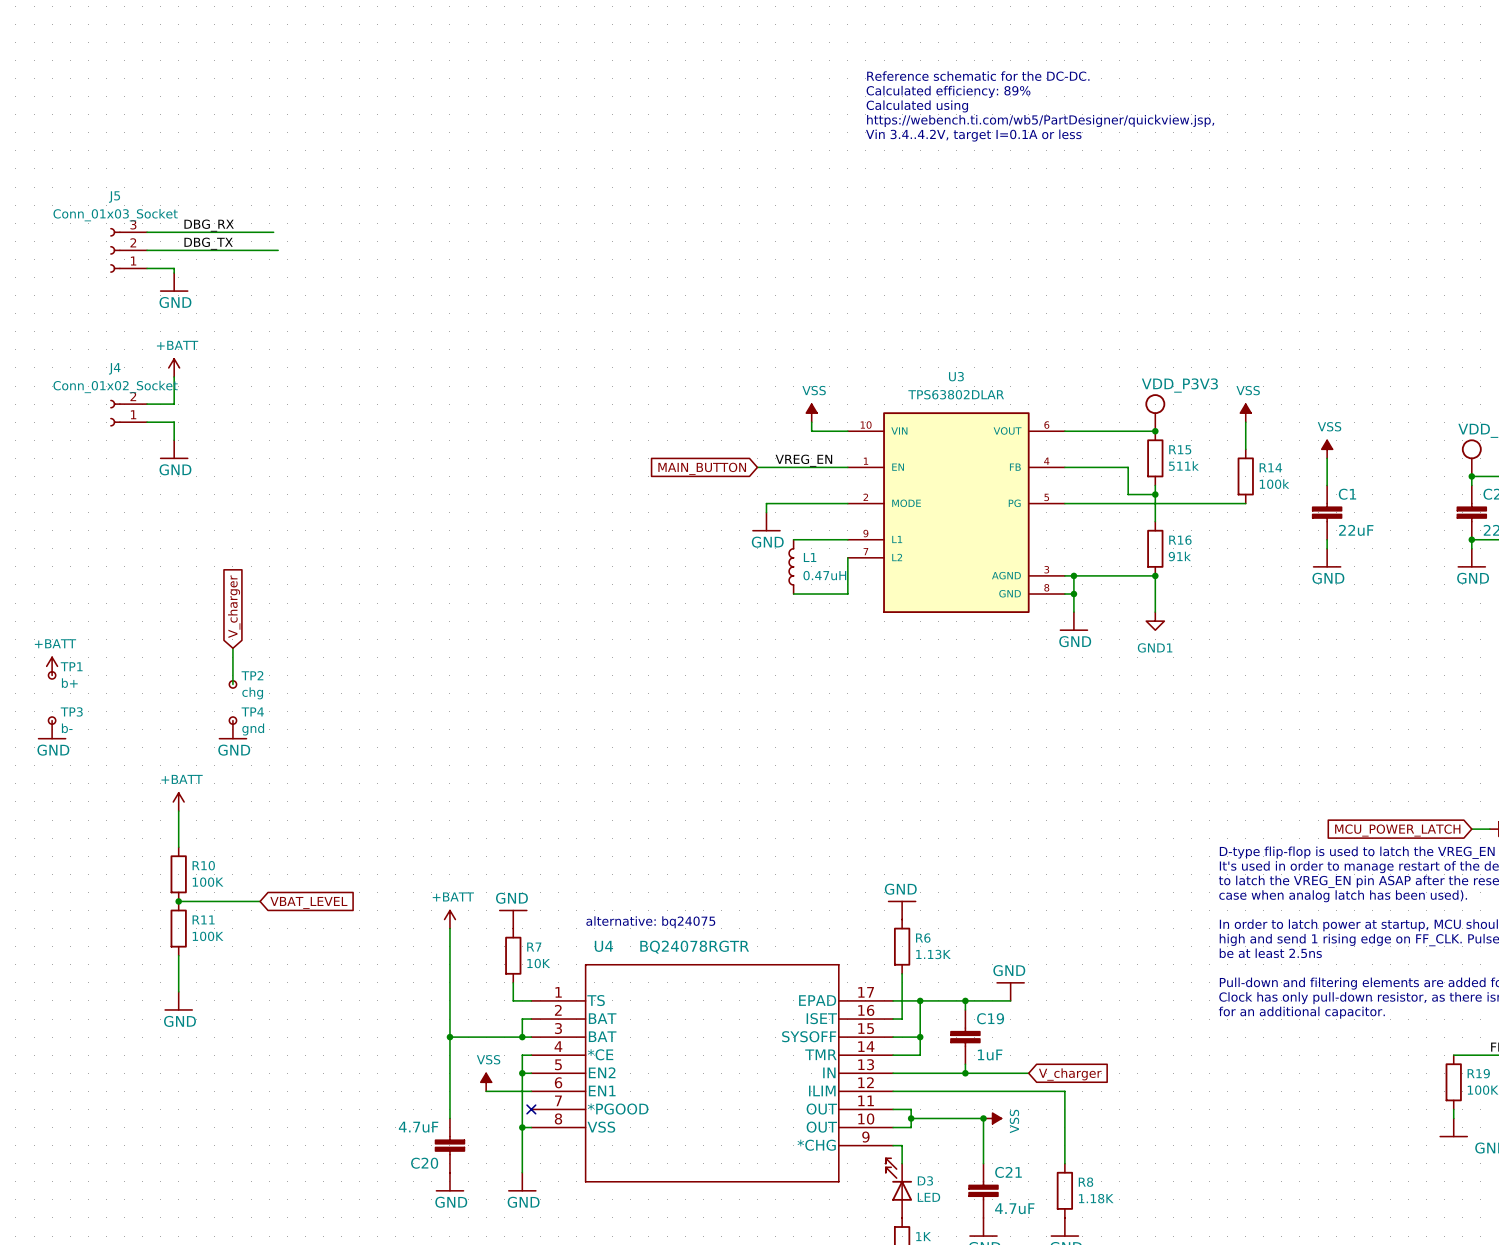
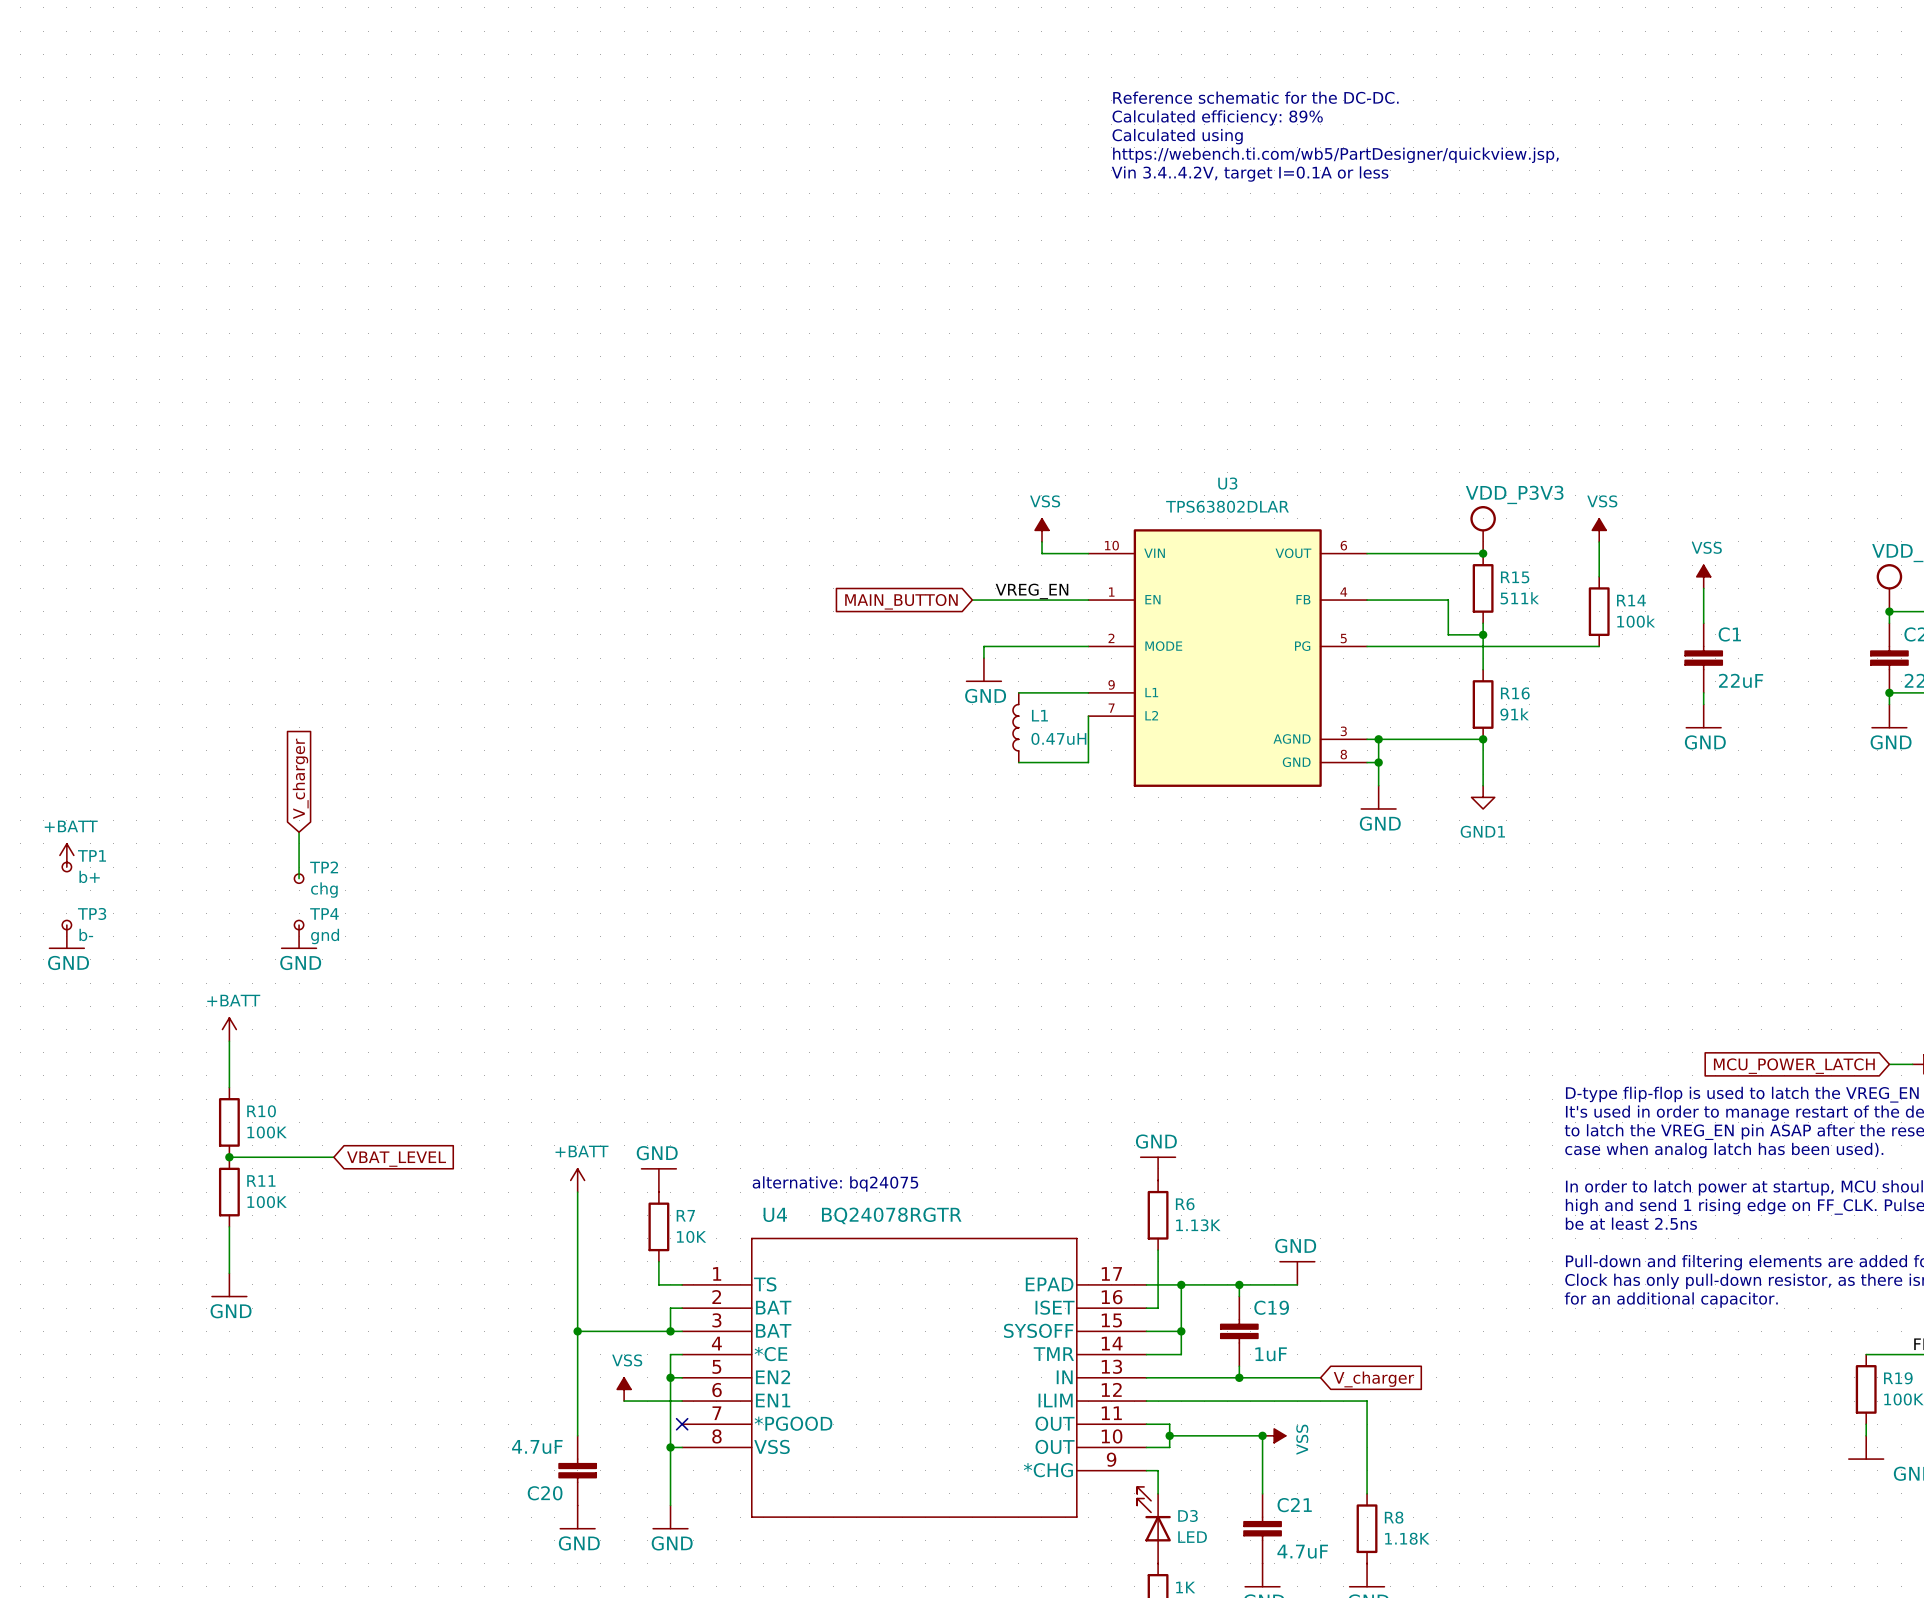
label: DBG_RX (209, 225) -> none
wire: (147, 232) (273, 232) -> none
label: DBG_TX (208, 243) -> none
J5: Conn_01x03_Socket (128, 250) -> none
wire: (147, 250) (278, 250) -> none
wire: (147, 268) (174, 268) (174, 272) -> none
power symbol: GND (174, 282) -> none
power symbol: +BATT (174, 367) -> none
wire: (174, 376) (174, 404) (147, 404) -> none
J4: Conn_01x02_Socket (128, 413) -> none
wire: (147, 422) (174, 422) (174, 440) -> none
power symbol: GND (174, 449) -> none

